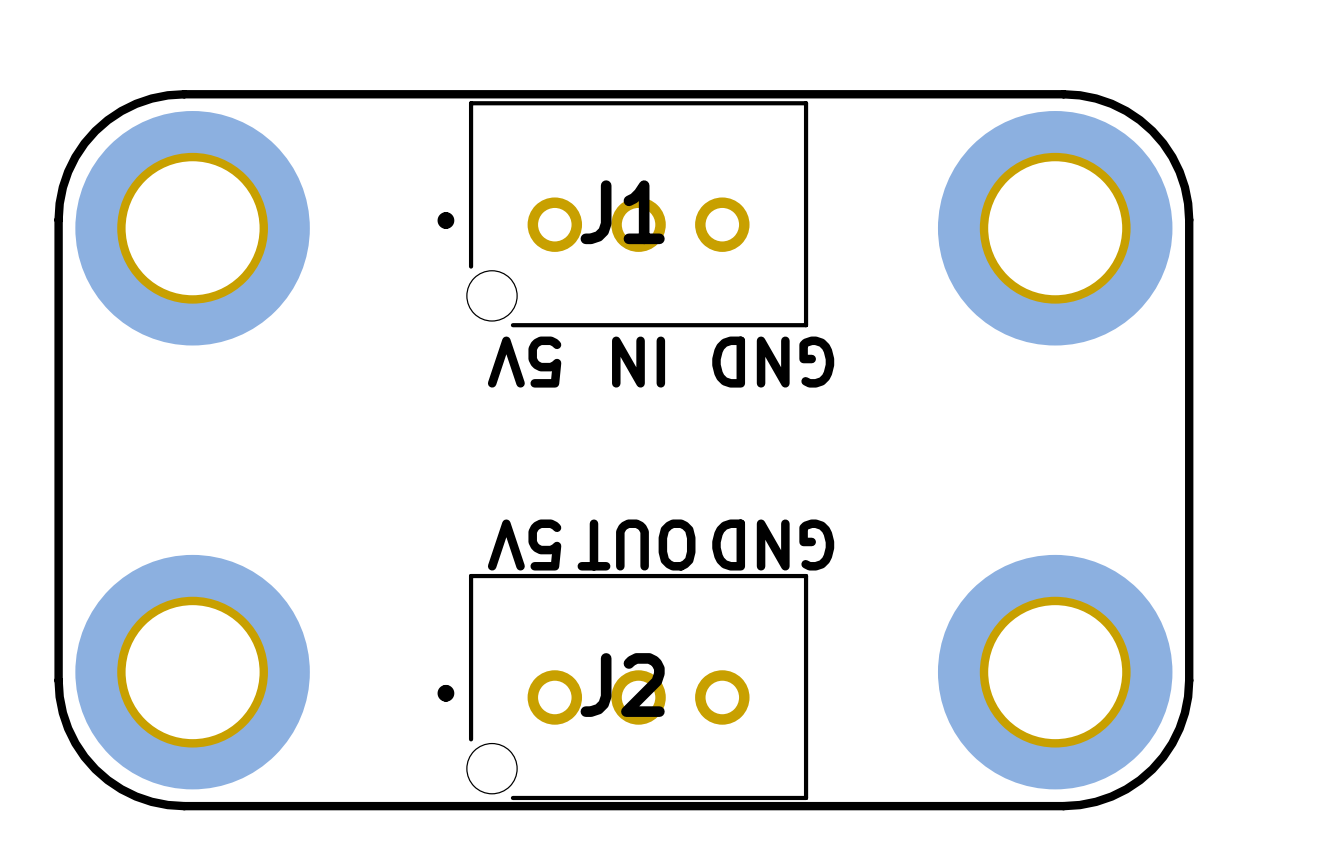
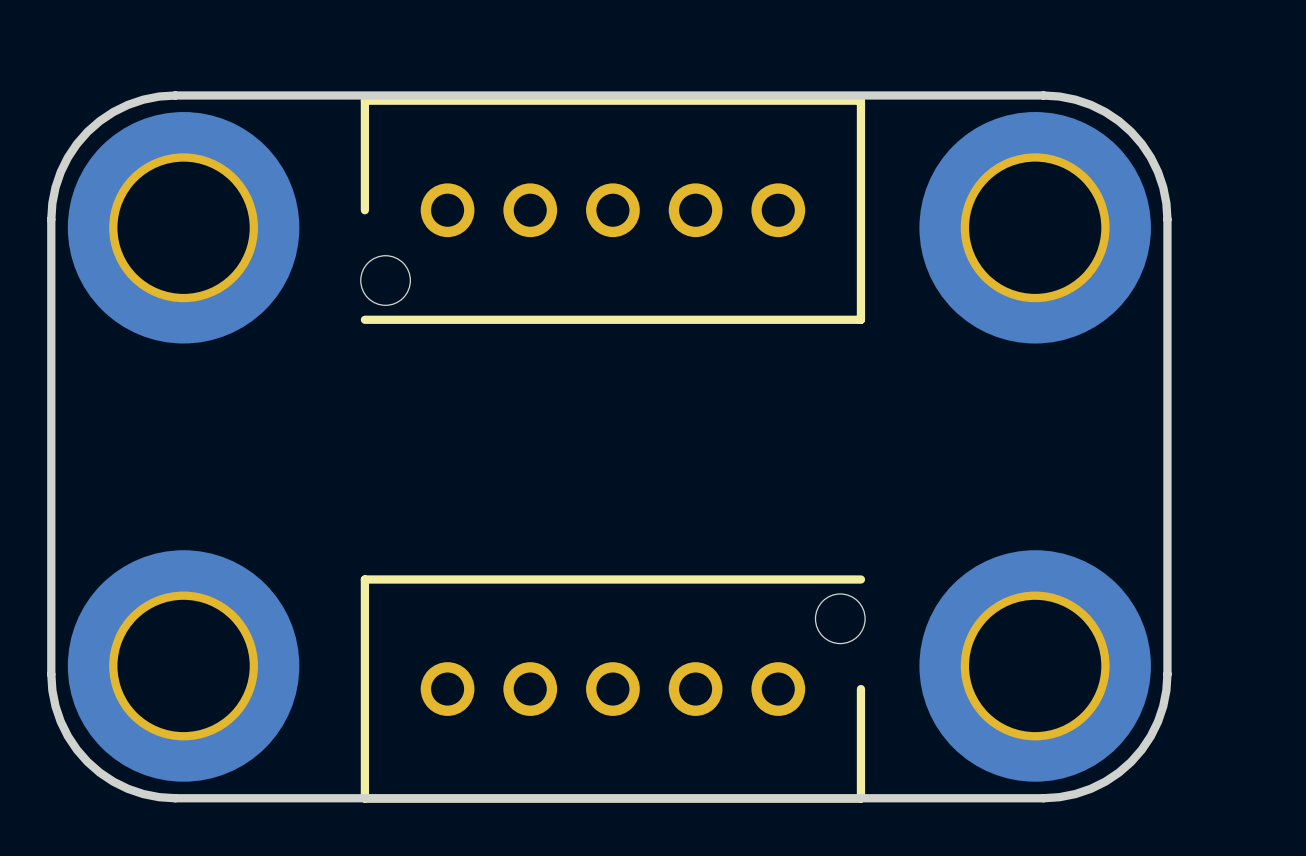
part: none -> (612, 210)
J1: (622, 214) -> none
text: 5V (524, 362) -> none
text: IN (638, 362) -> none
text: GND (773, 362) -> none
text: 5V (524, 545) -> none
text: OUT (636, 545) -> none
text: GND (773, 545) -> none
J2: (622, 687) -> none
part: none -> (612, 689)

